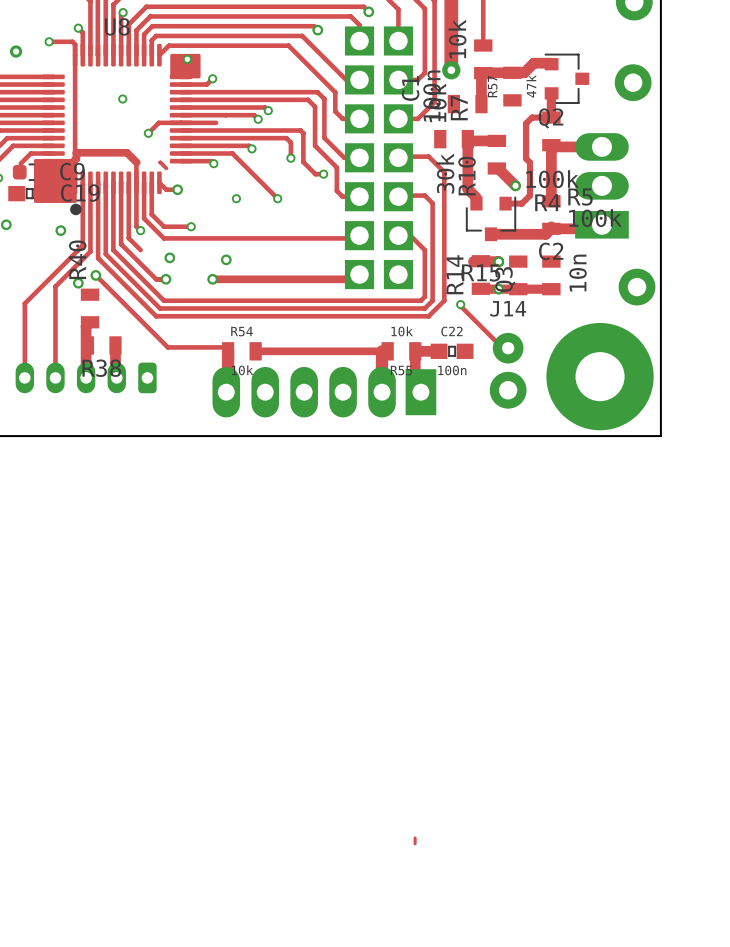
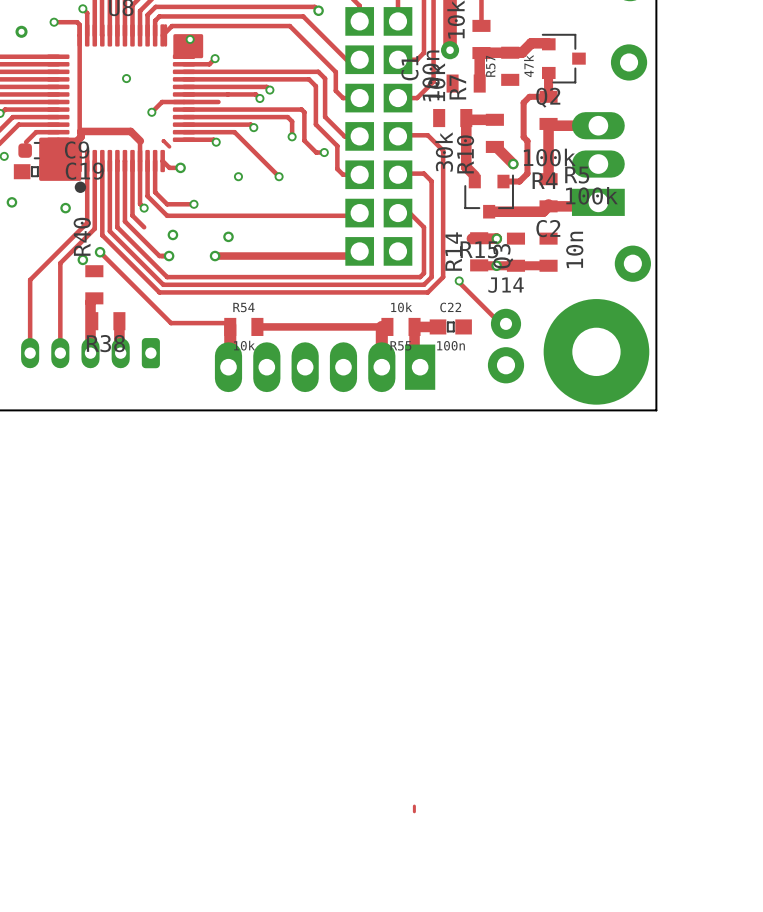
track: none -> (165, 25) (165, 45)

